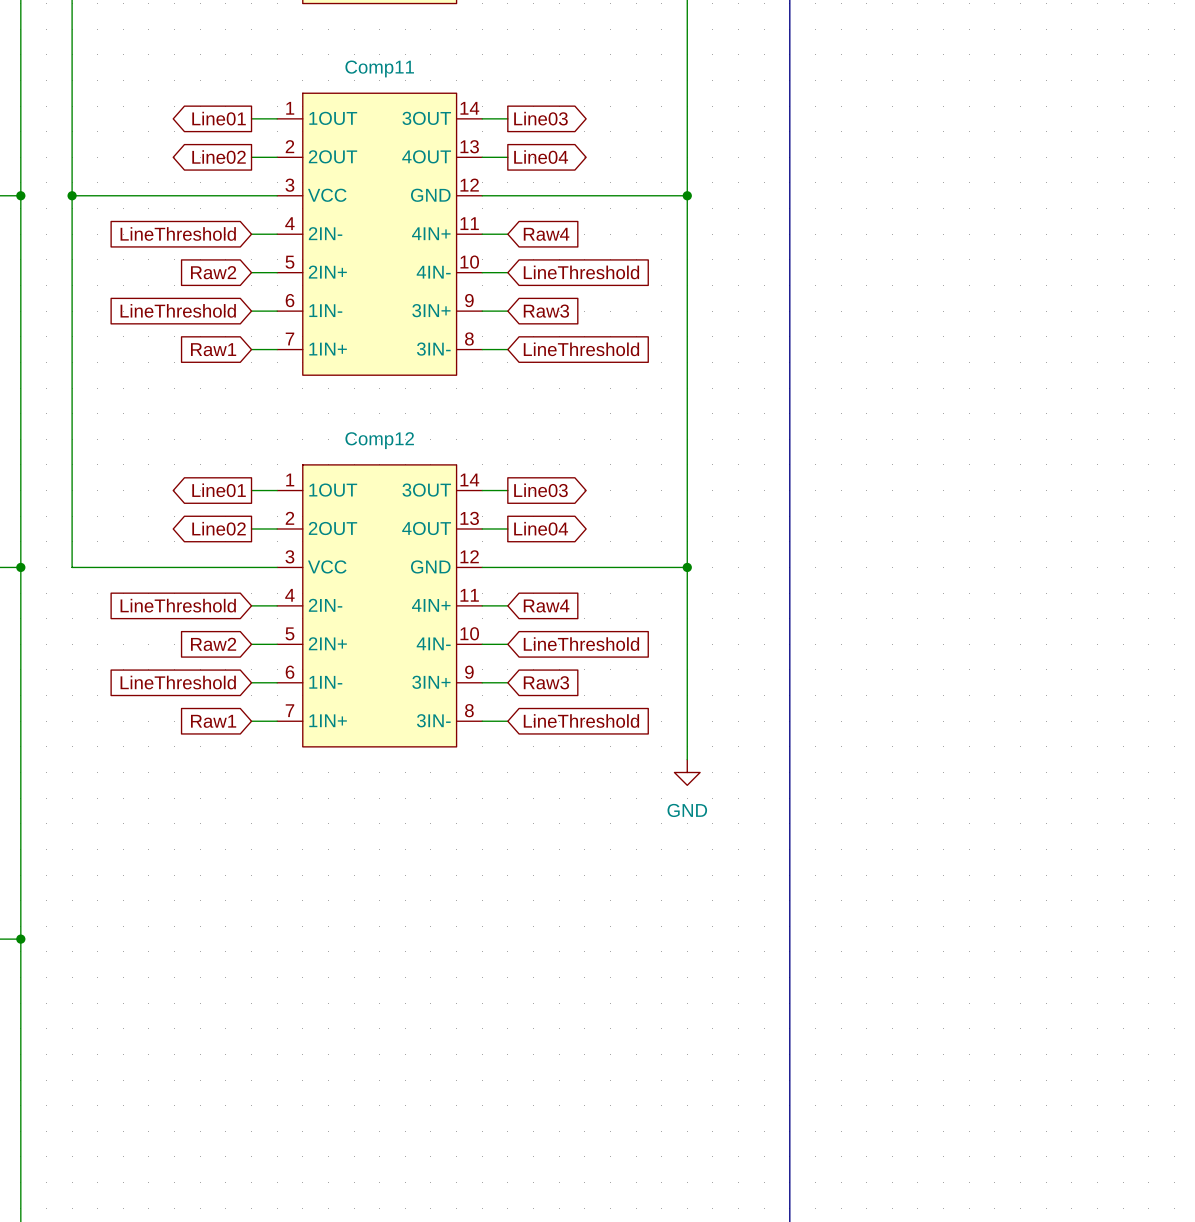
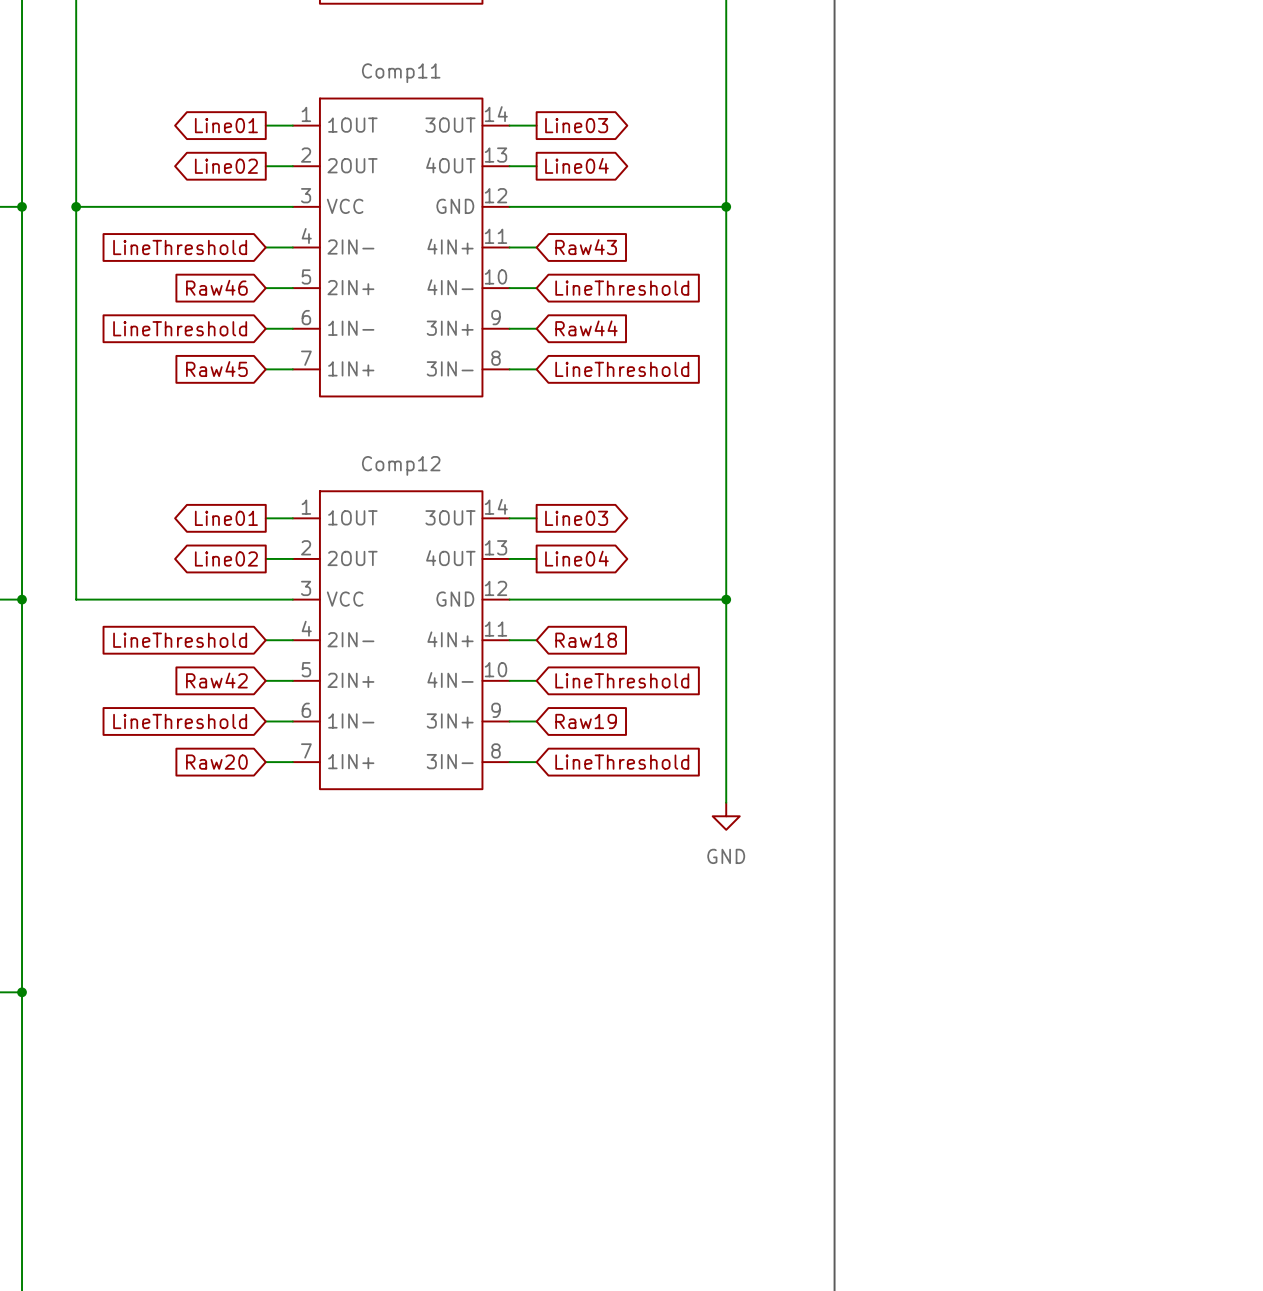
global label: Raw4 (546, 234) -> Raw43 (586, 247)
global label: Raw2 (213, 272) -> Raw46 (216, 287)
global label: Raw3 (546, 311) -> Raw44 (586, 328)
global label: Raw1 (213, 349) -> Raw45 (216, 369)
global label: Raw4 (546, 605) -> Raw18 (586, 640)
global label: Raw2 (213, 644) -> Raw42 (216, 680)
global label: Raw3 (546, 682) -> Raw19 (586, 721)
global label: Raw1 (213, 721) -> Raw20 (216, 762)

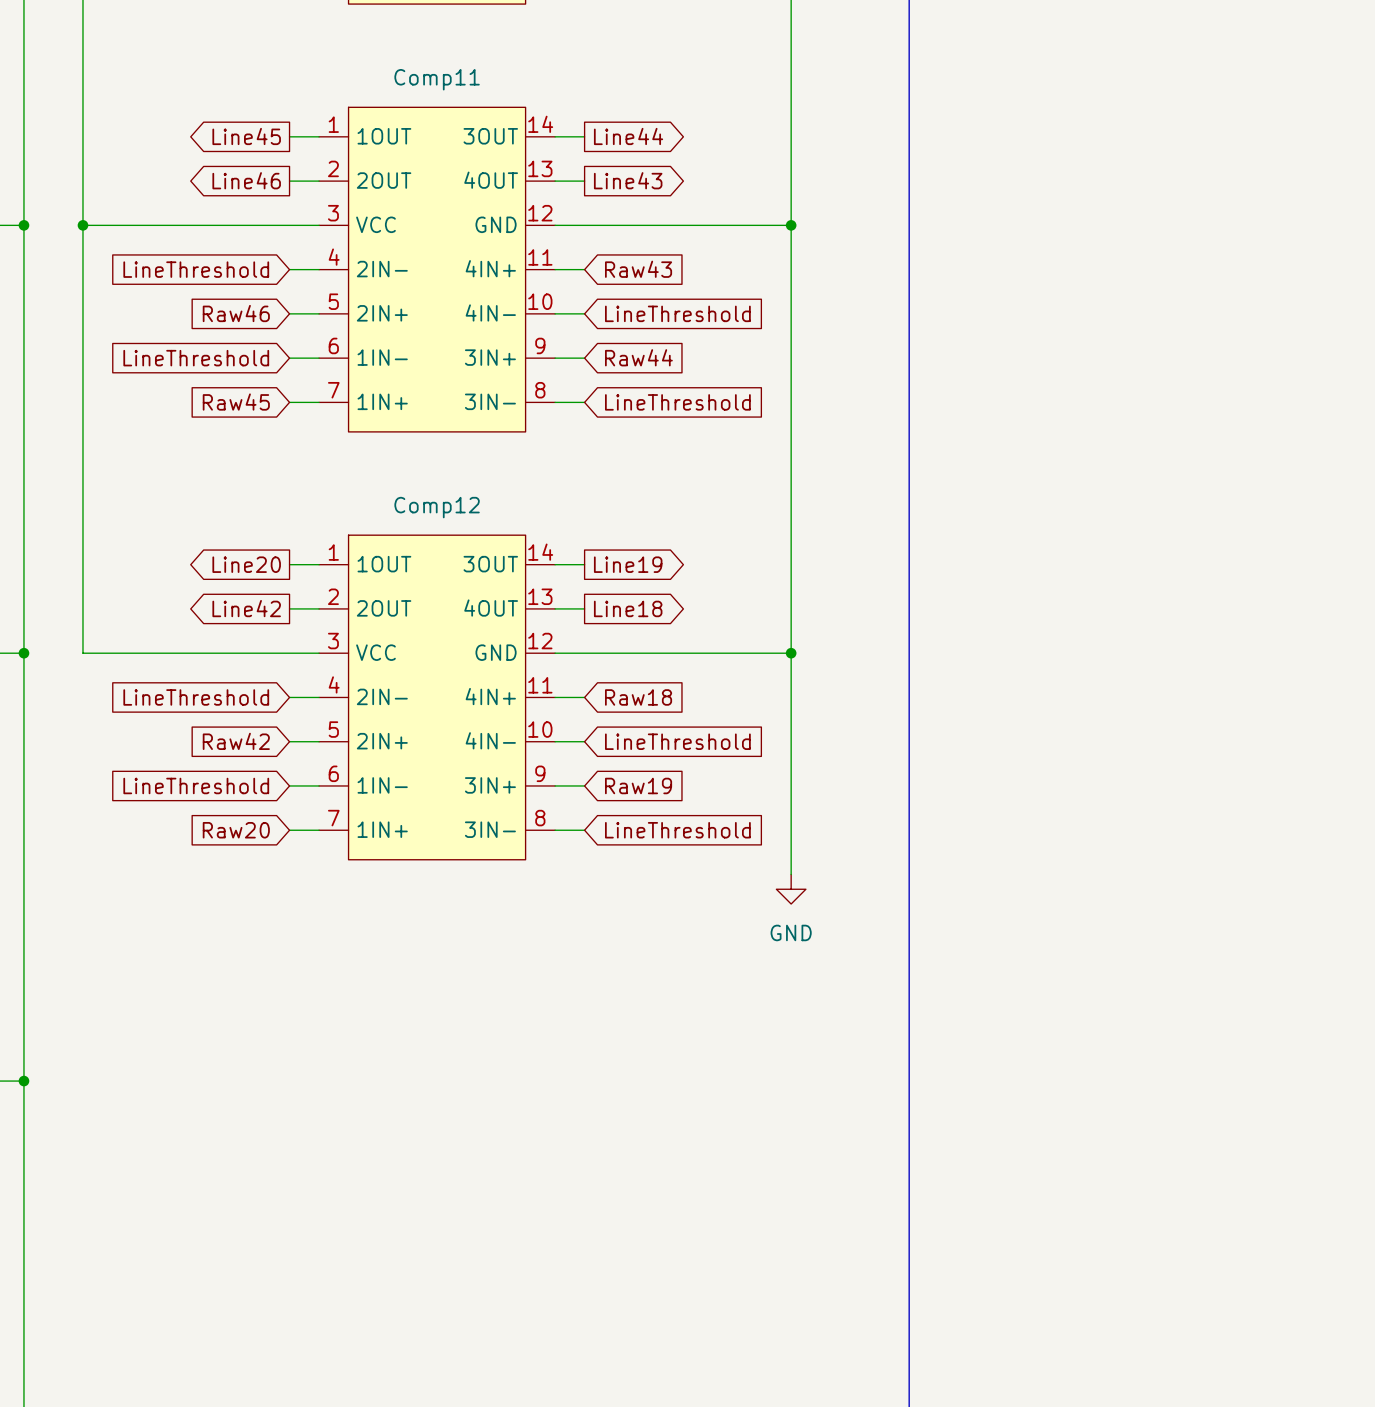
global label: Line01 (226, 125) -> Line45 (246, 136)
global label: Line03 (576, 125) -> Line44 (628, 136)
global label: Line04 (576, 165) -> Line43 (628, 180)
global label: Line02 (226, 166) -> Line46 (246, 180)
global label: Line01 (226, 518) -> Line20 (246, 564)
global label: Line03 (576, 518) -> Line19 (628, 564)
global label: Line02 (226, 558) -> Line42 (246, 608)
global label: Line04 (576, 558) -> Line18 (628, 608)

